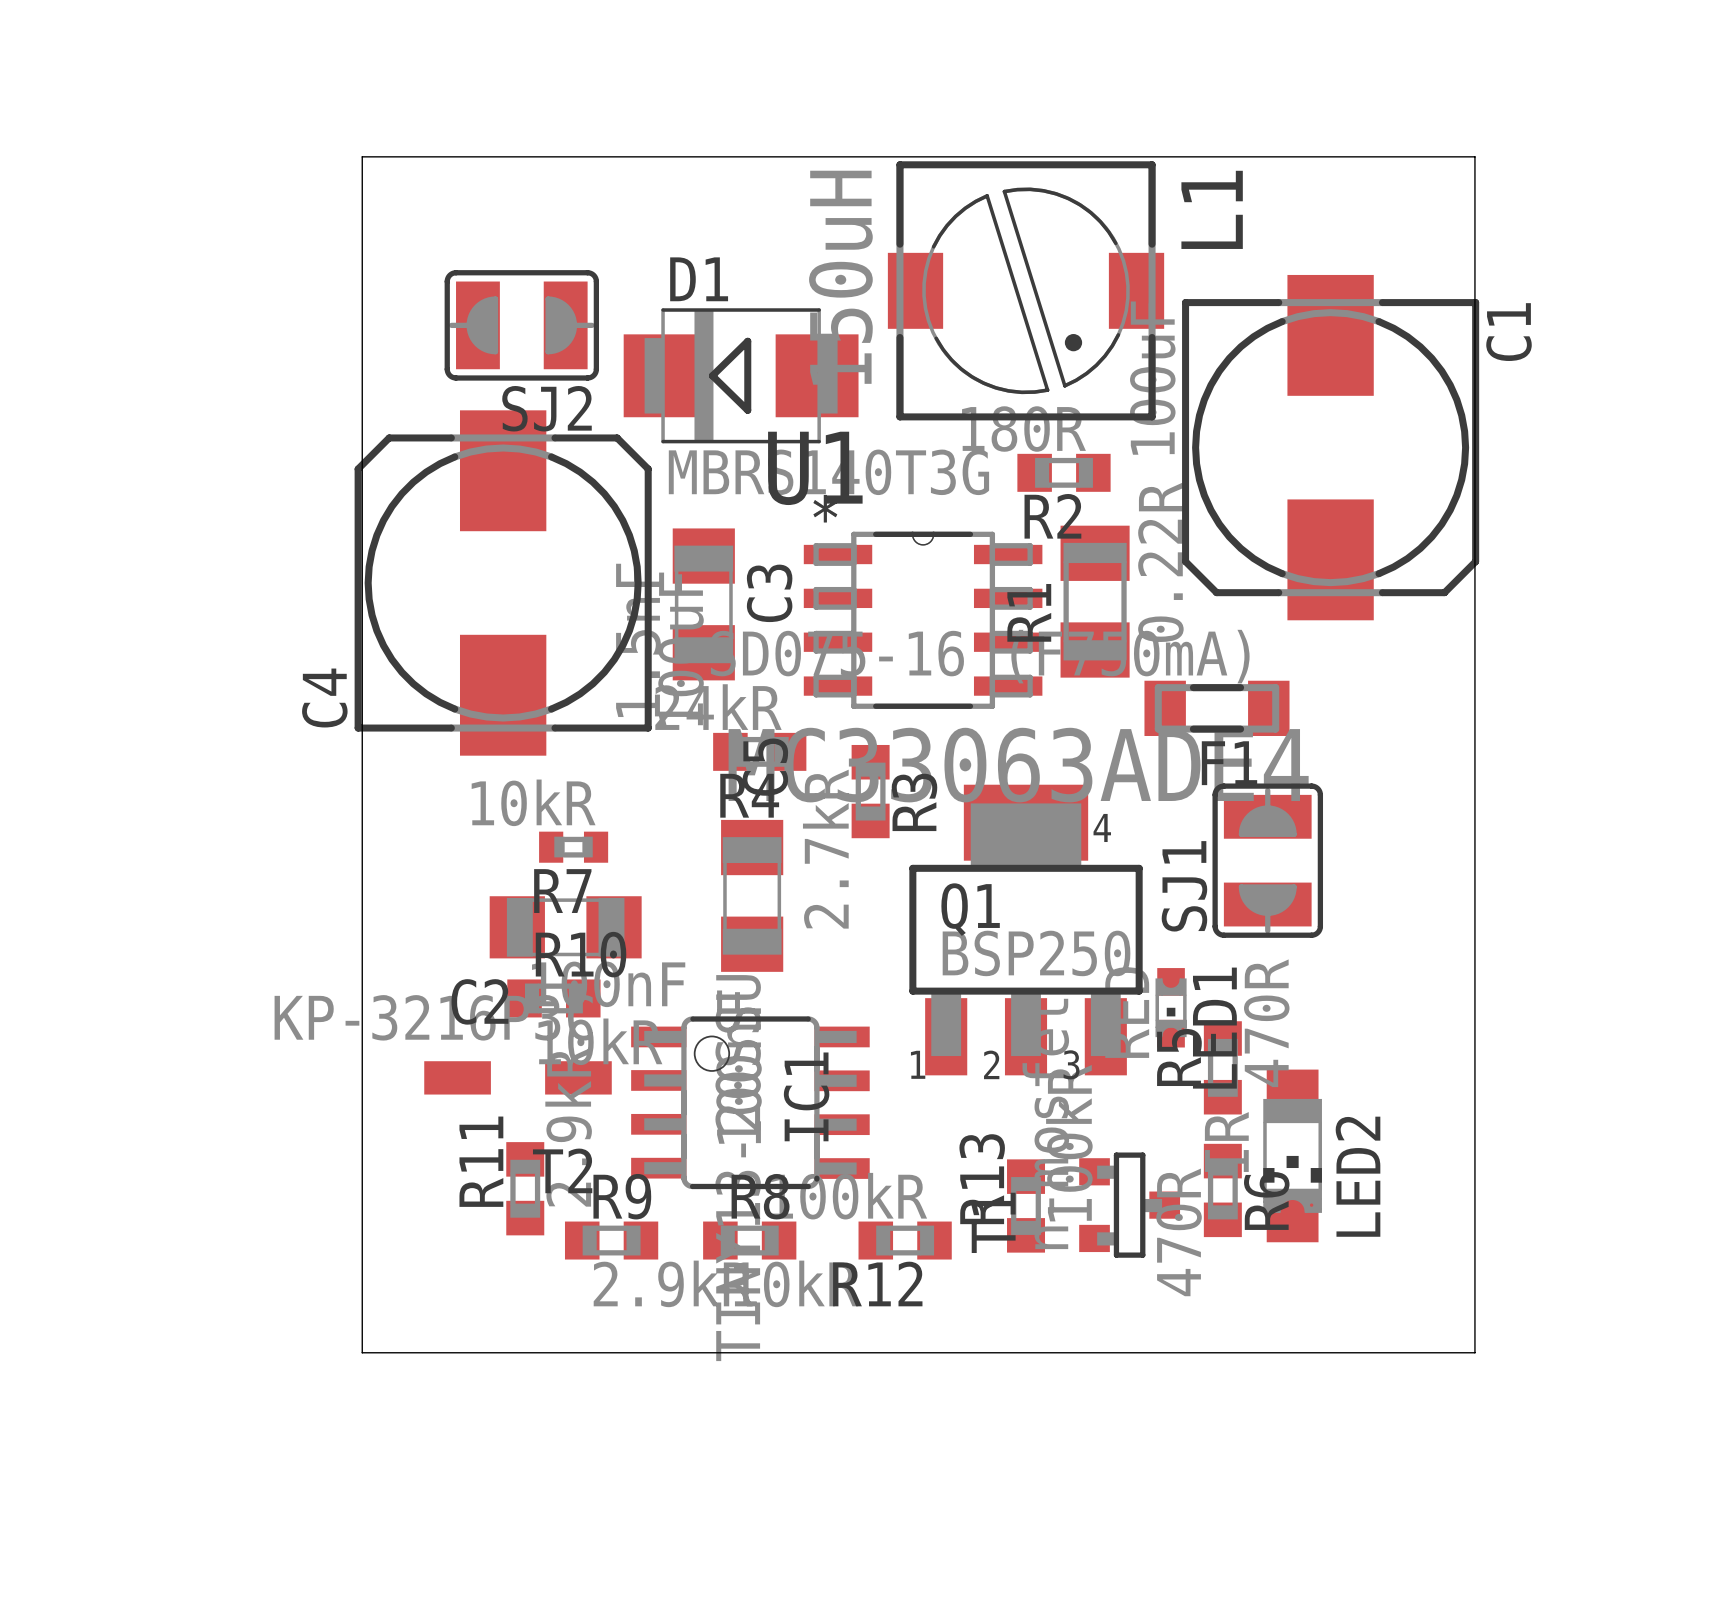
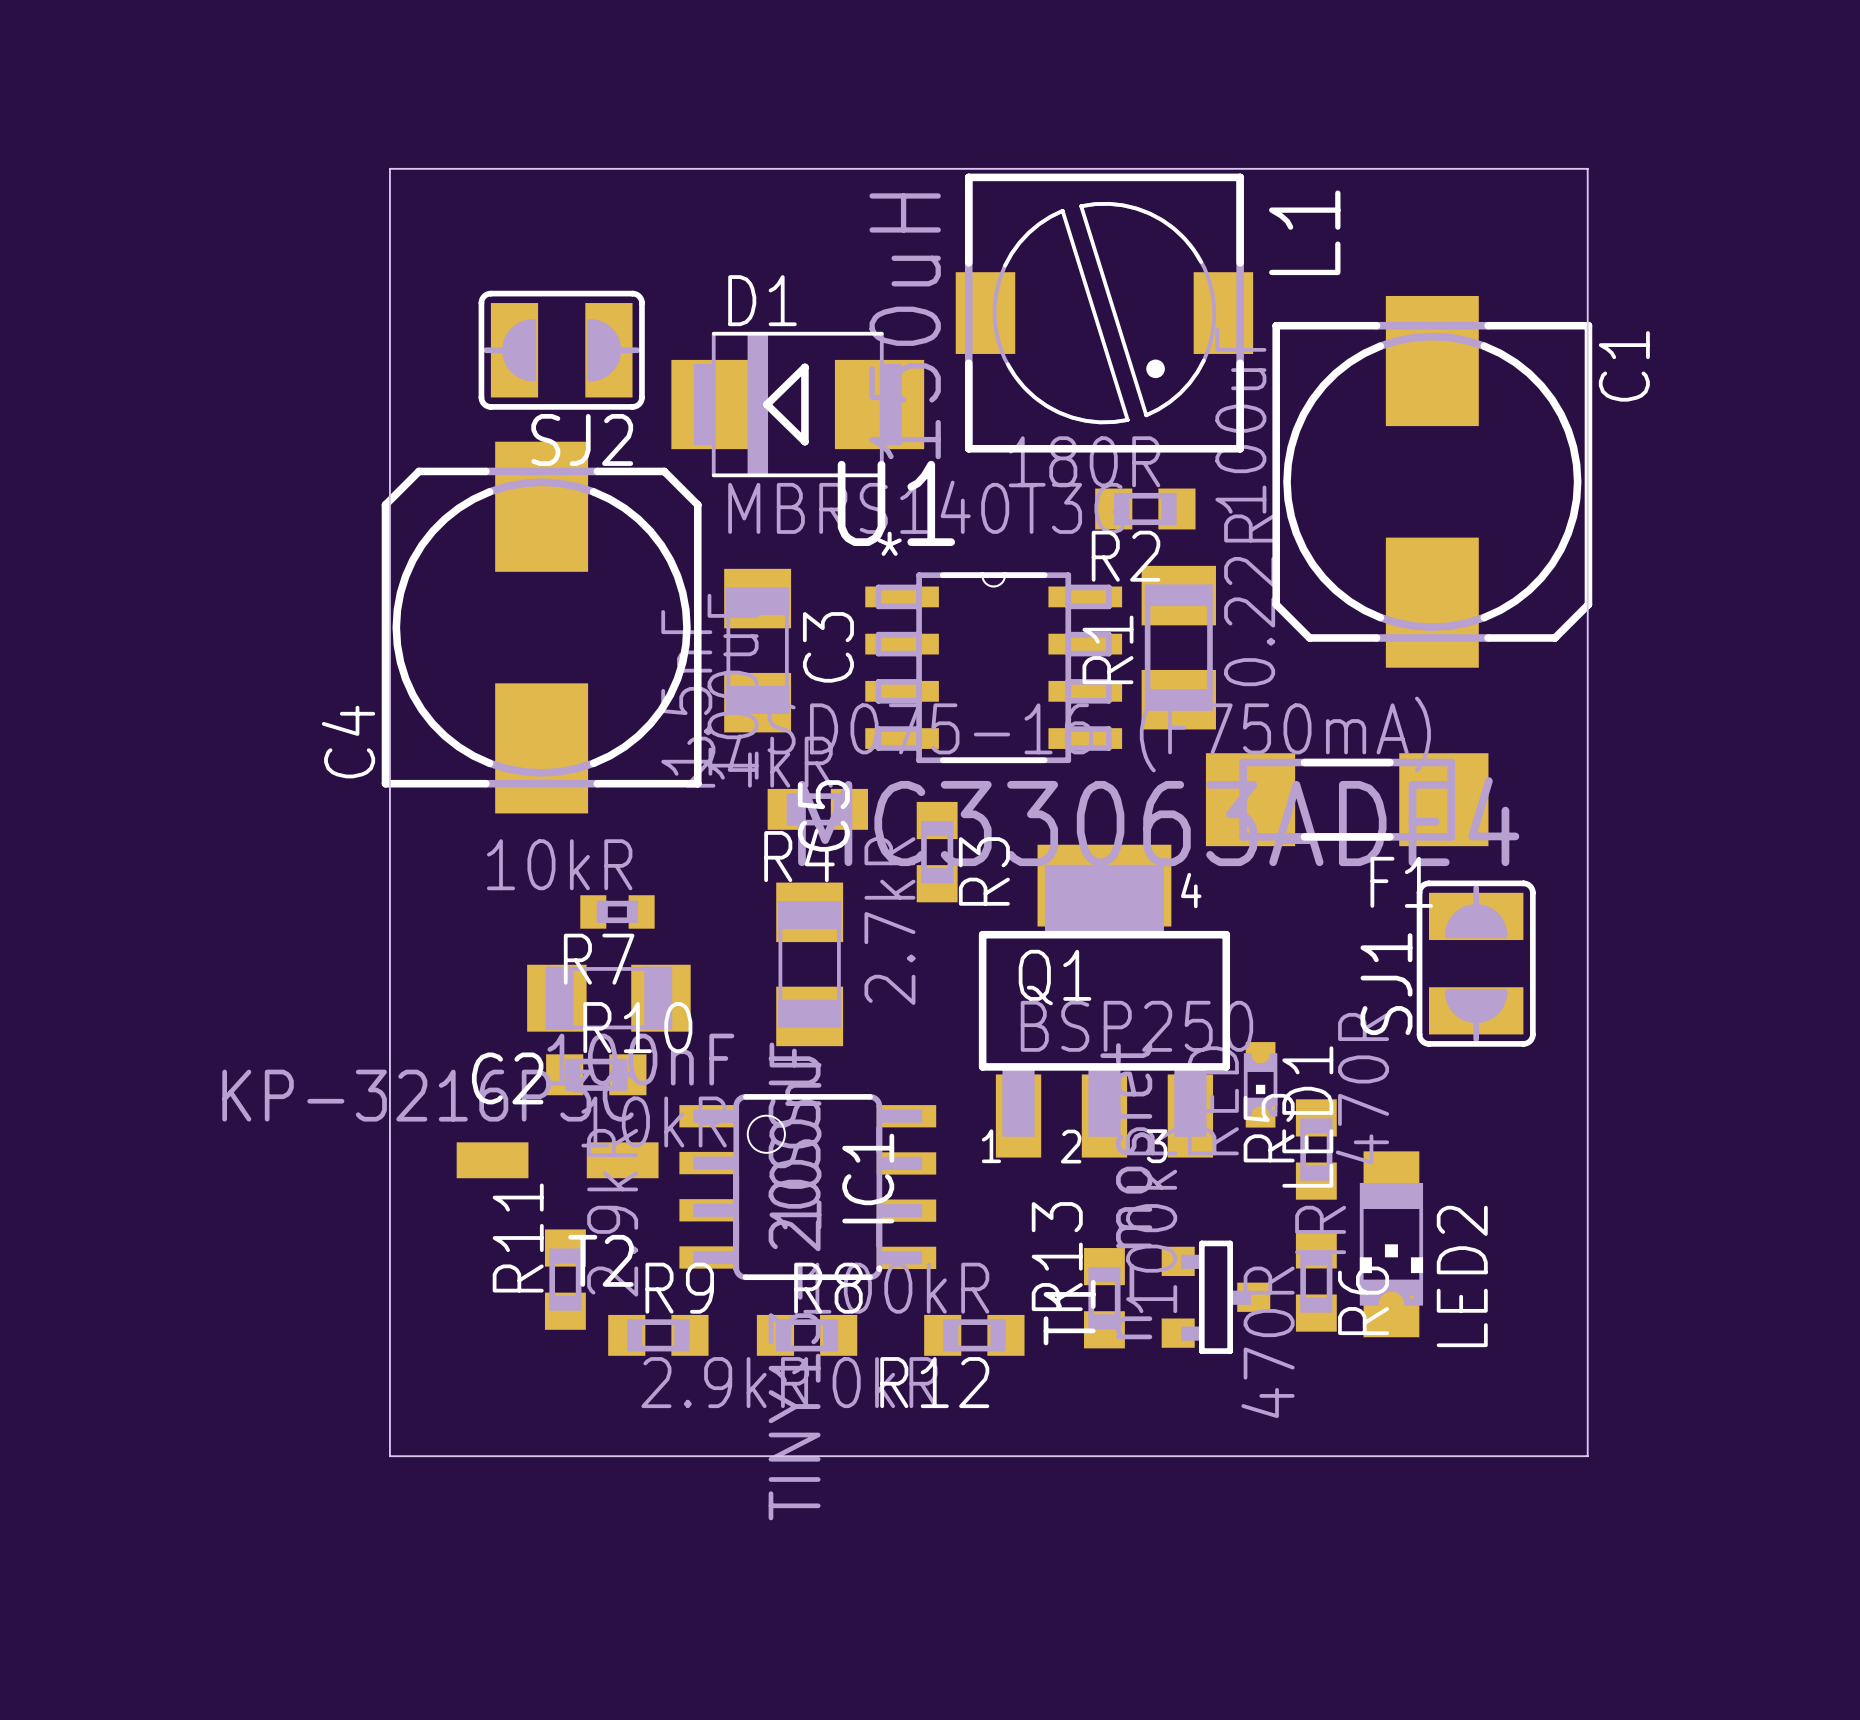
F1 footprint: [1144, 680, 1290, 736] -> [1205, 753, 1489, 847]
SJ1 position: (1267, 860) -> (1476, 963)

